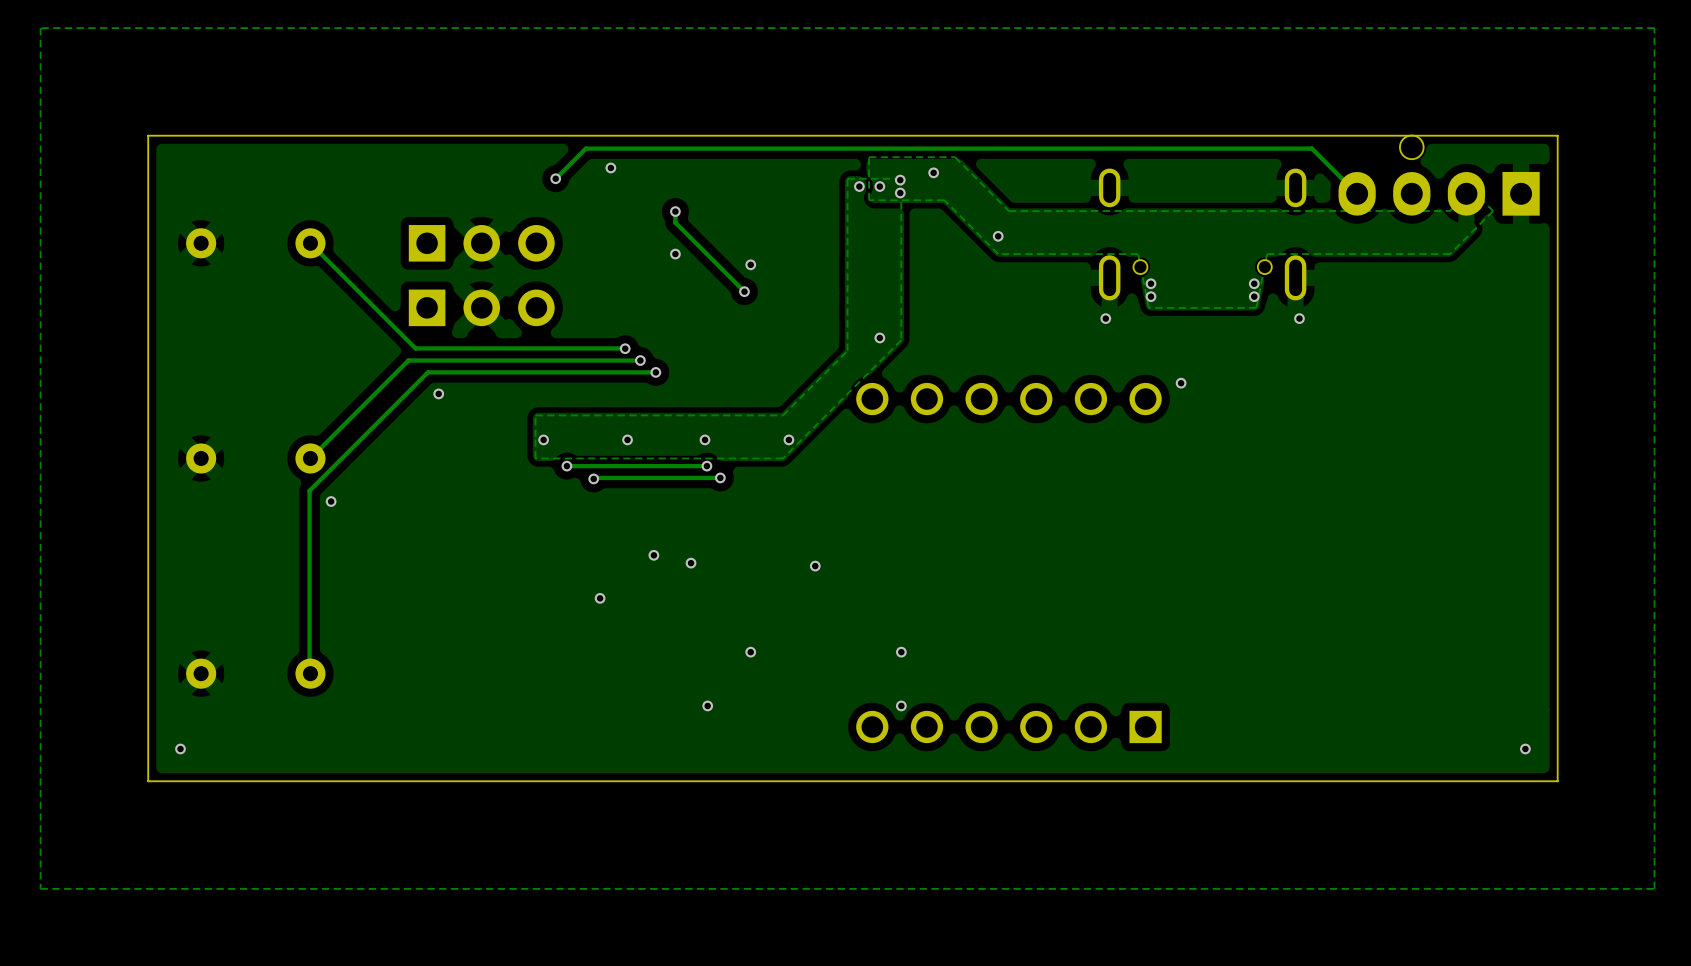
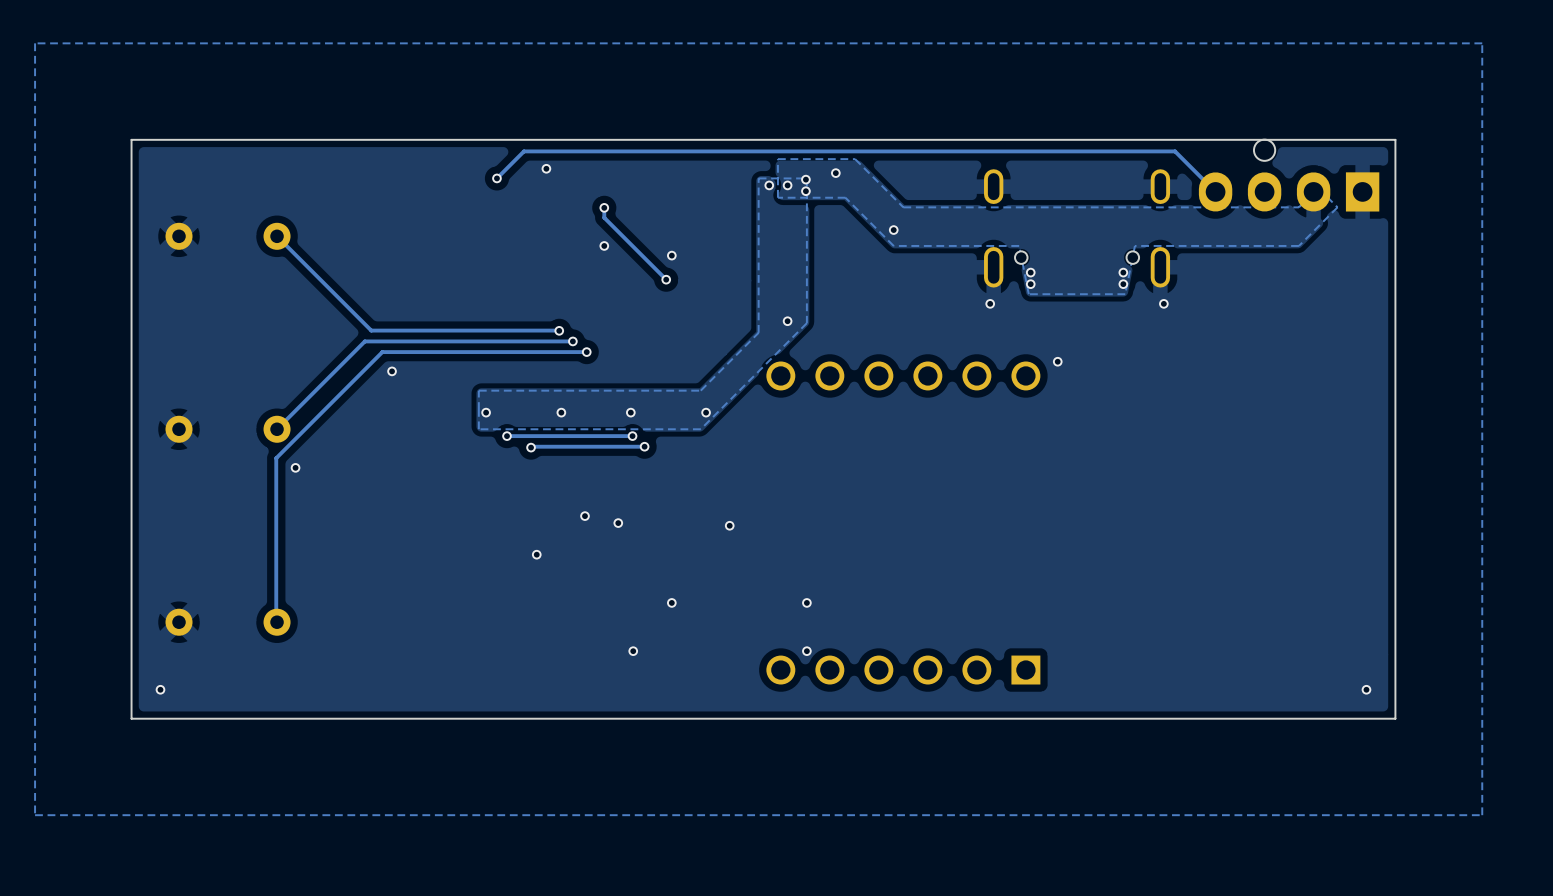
part: (481, 243) -> none
part: (481, 307) -> none

